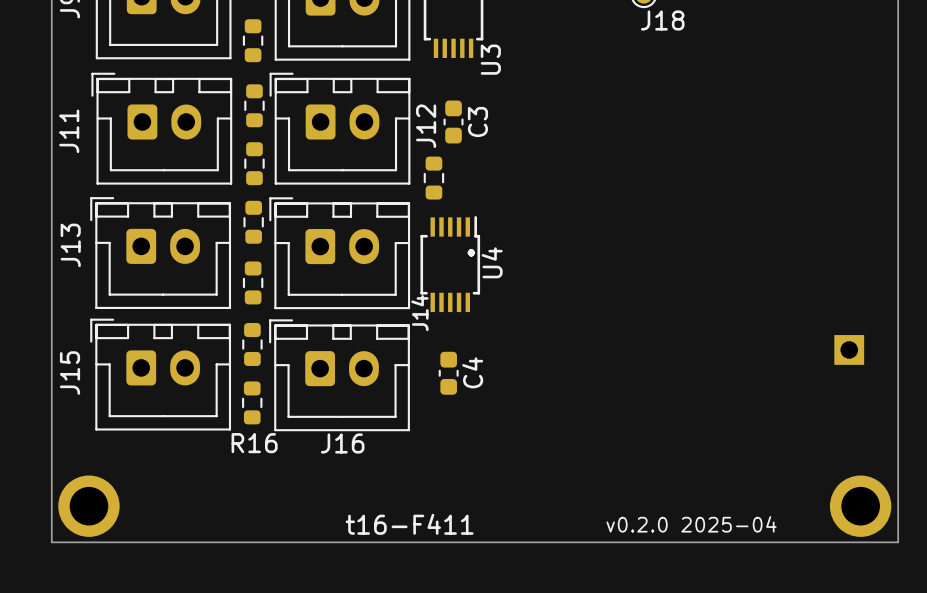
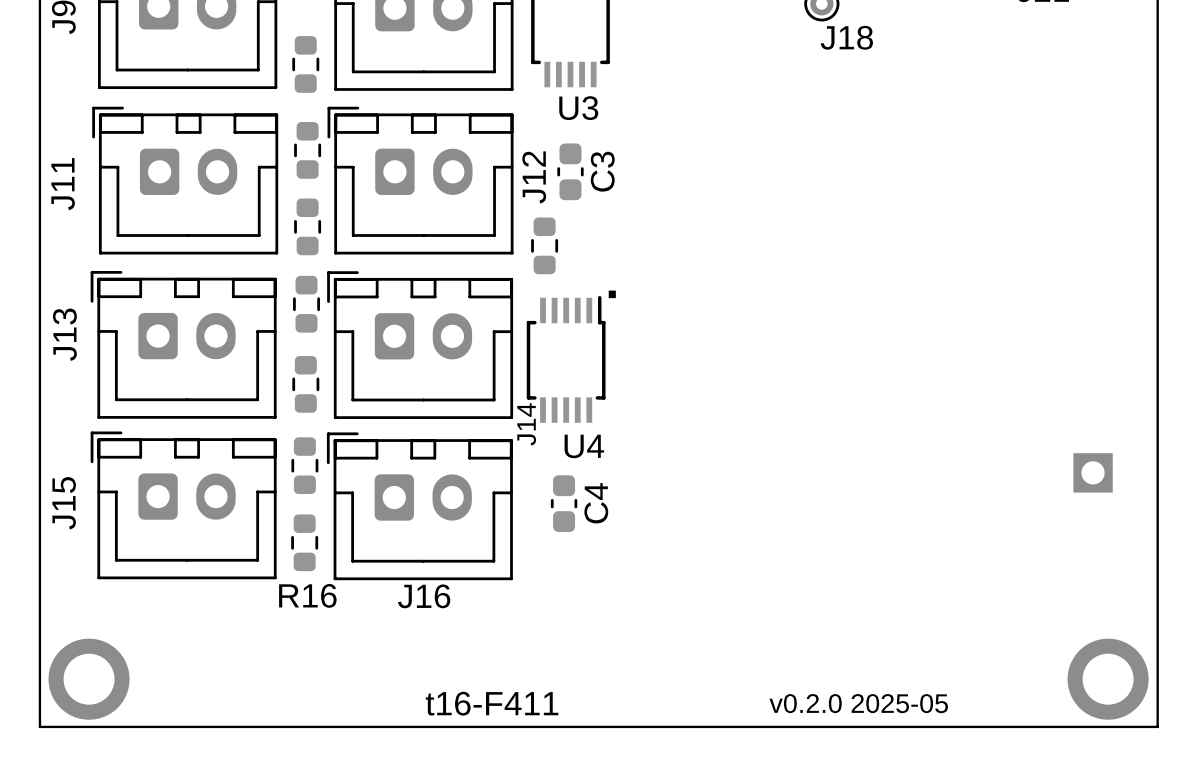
U3 name rotation: 0° (490, 59) -> 90° clockwise (578, 108)
text position: . (471, 252) -> . (612, 294)
U4 name rotation: 0° (492, 262) -> 90° clockwise (584, 446)
U4 name position: U4 (492, 262) -> U4 (584, 446)
text: v0.2.0 2025-04 (691, 524) -> v0.2.0 2025-05 (858, 703)

